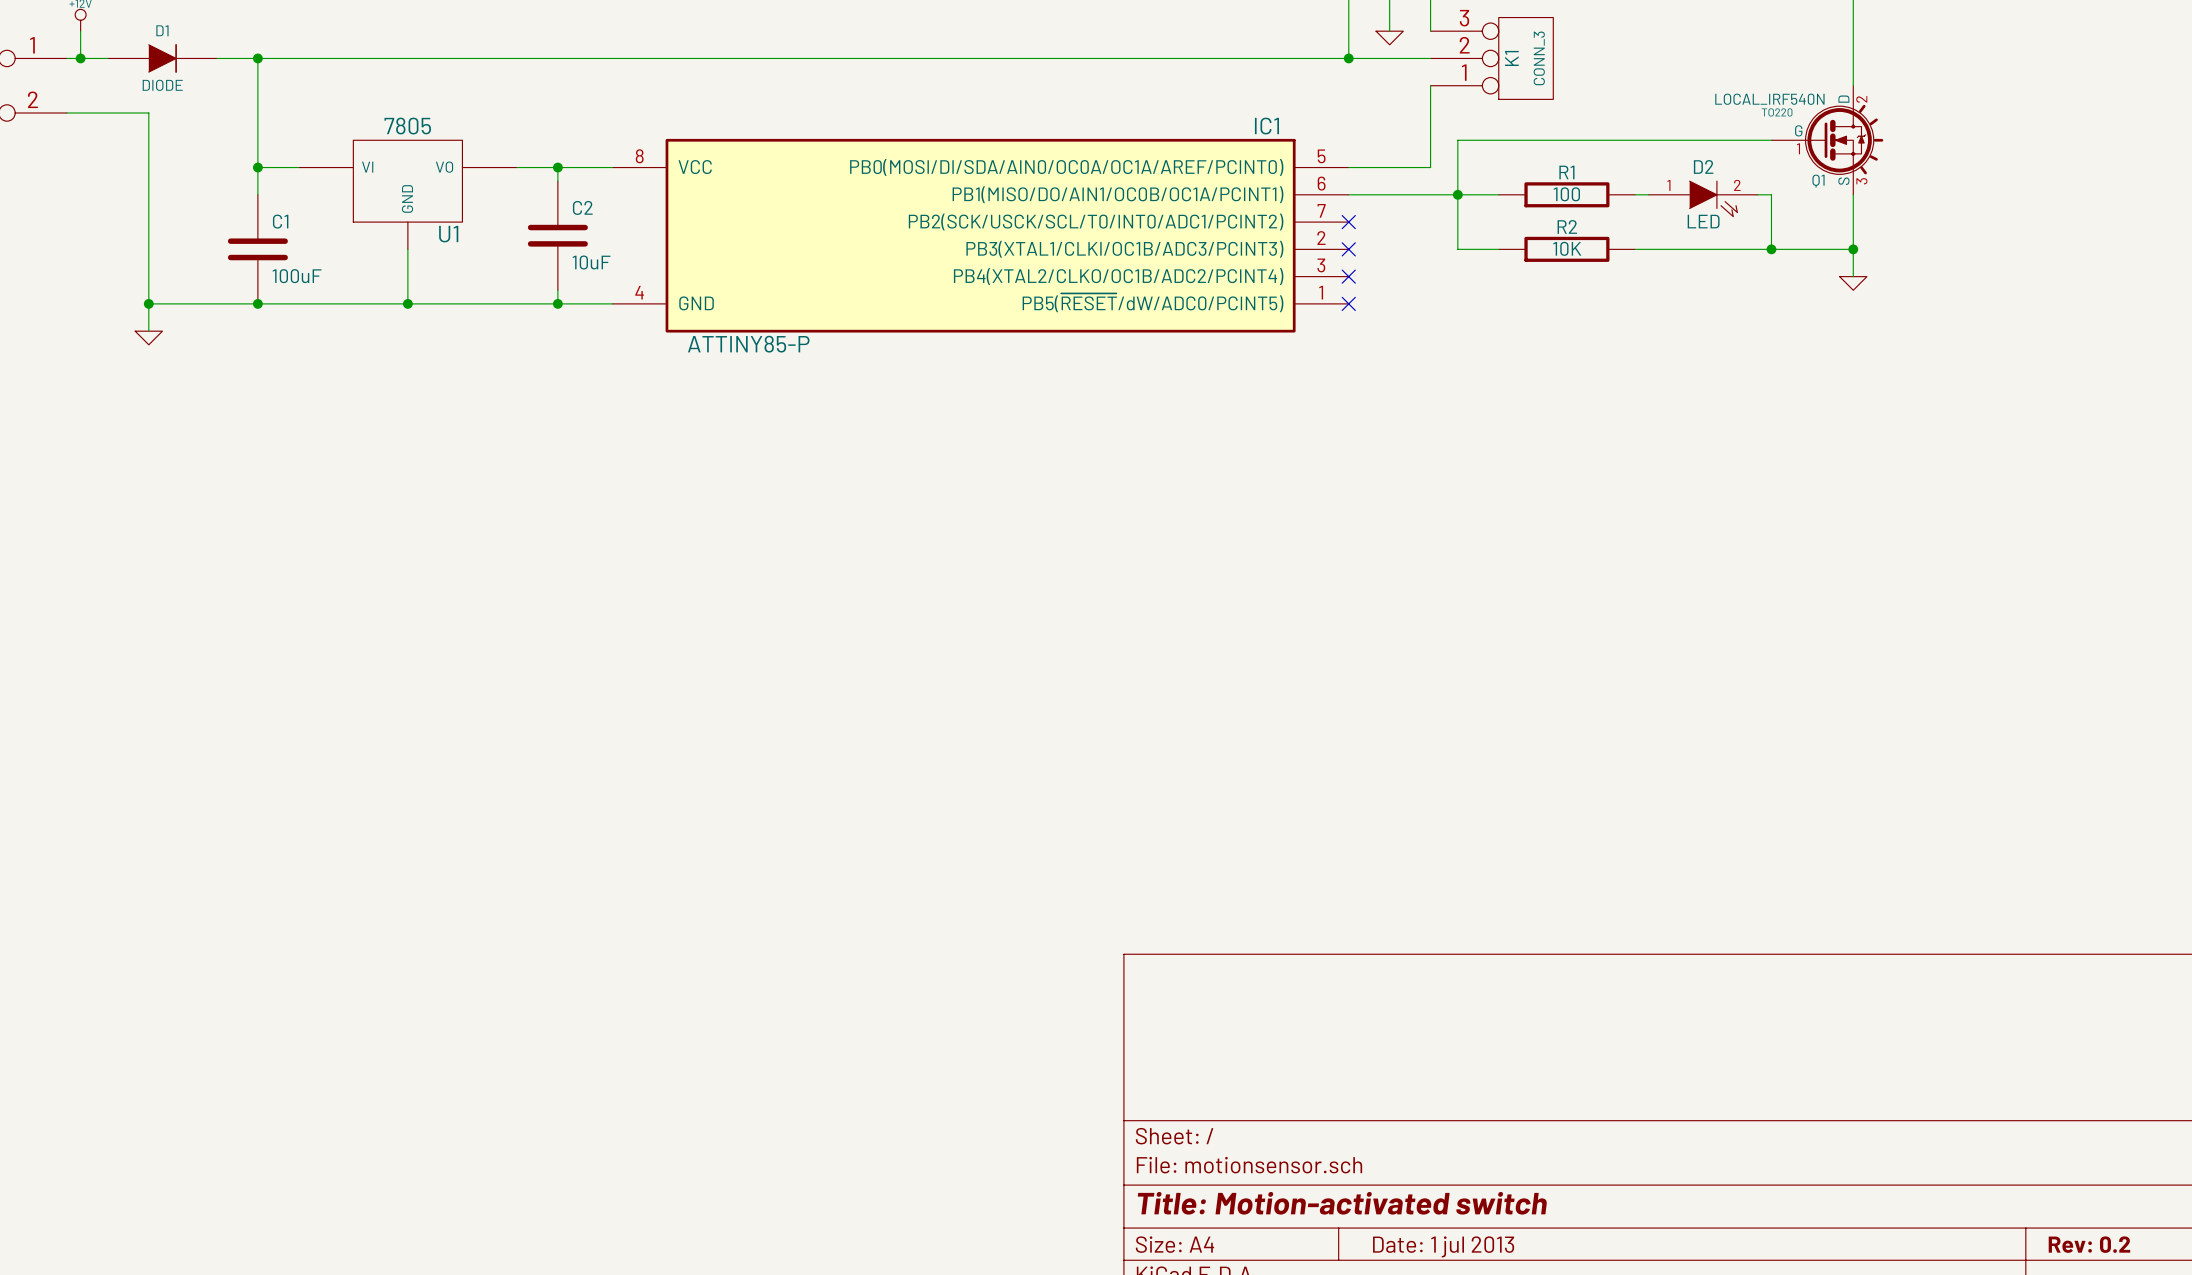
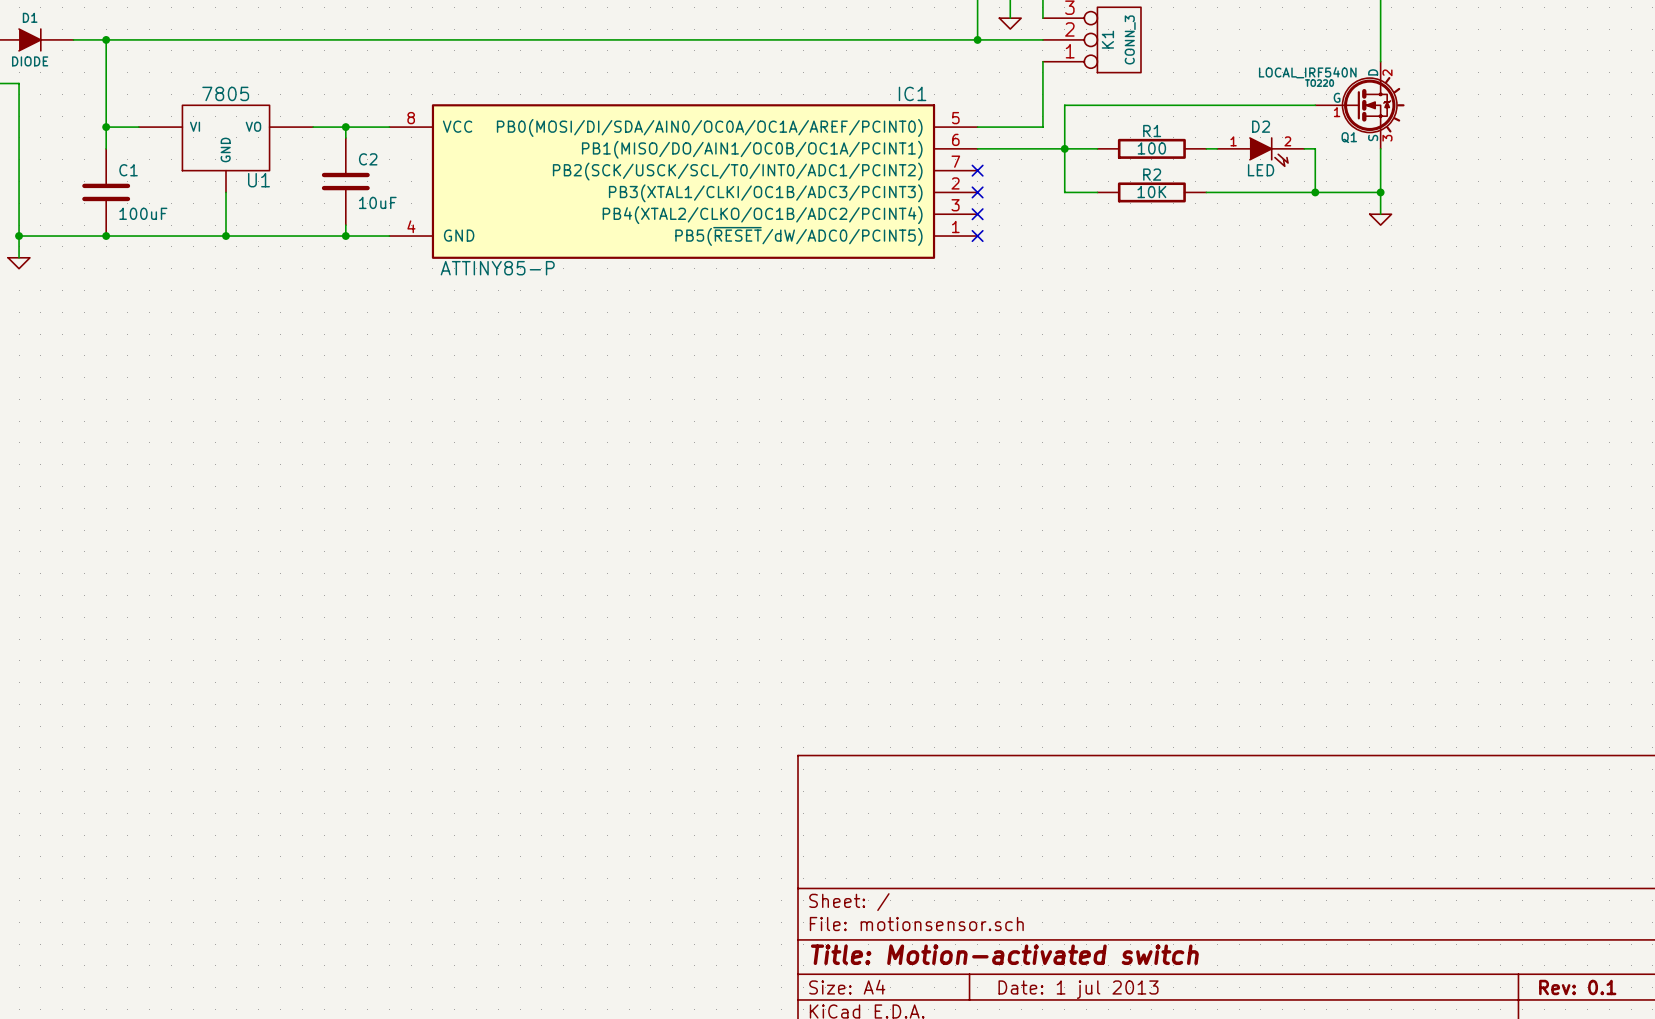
title block: Rev: 0.2 (2089, 1244) -> Rev: 0.1 (1577, 987)

